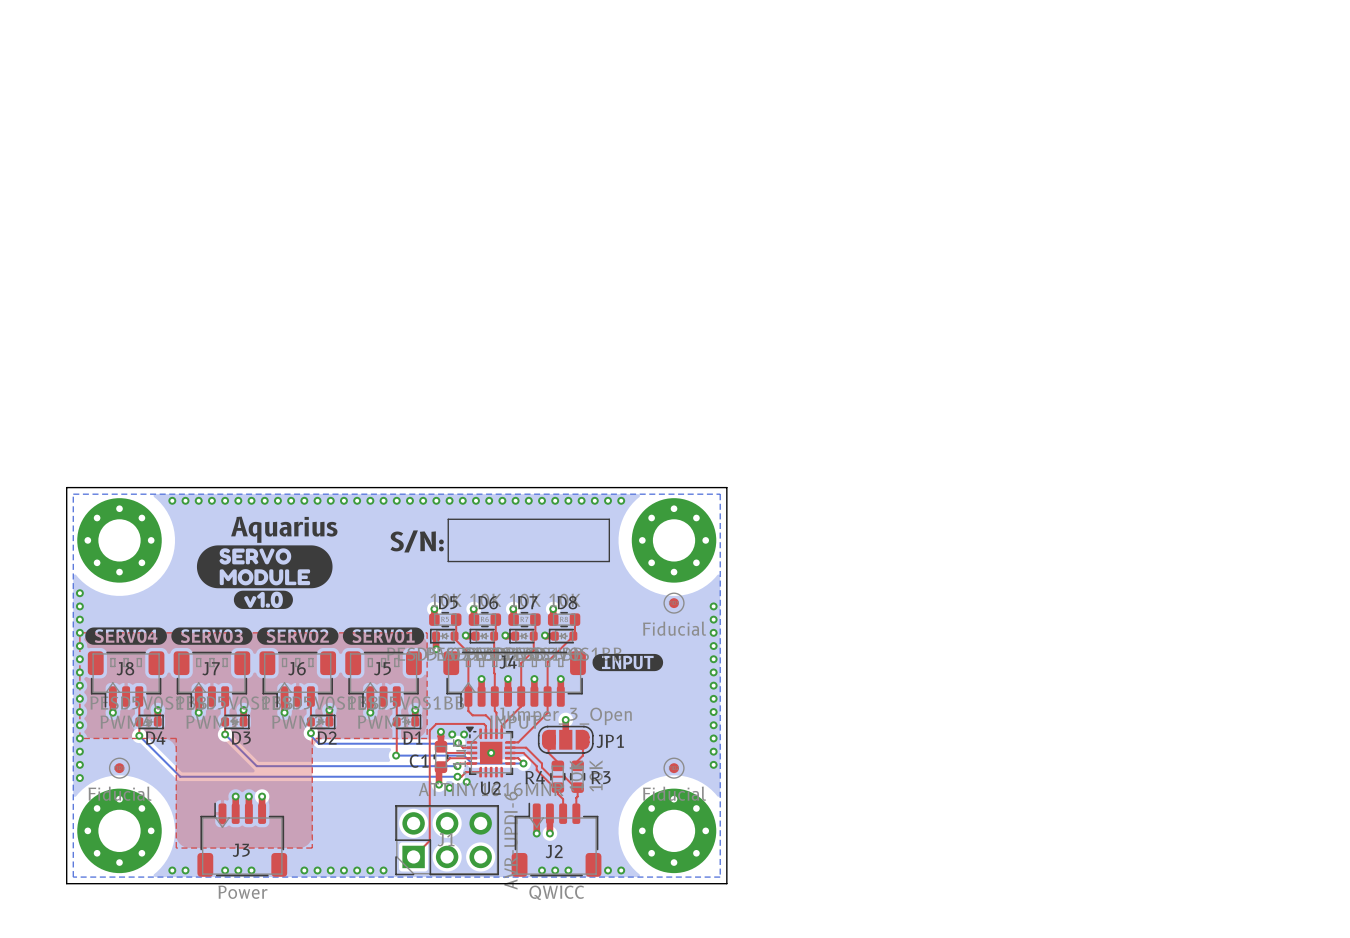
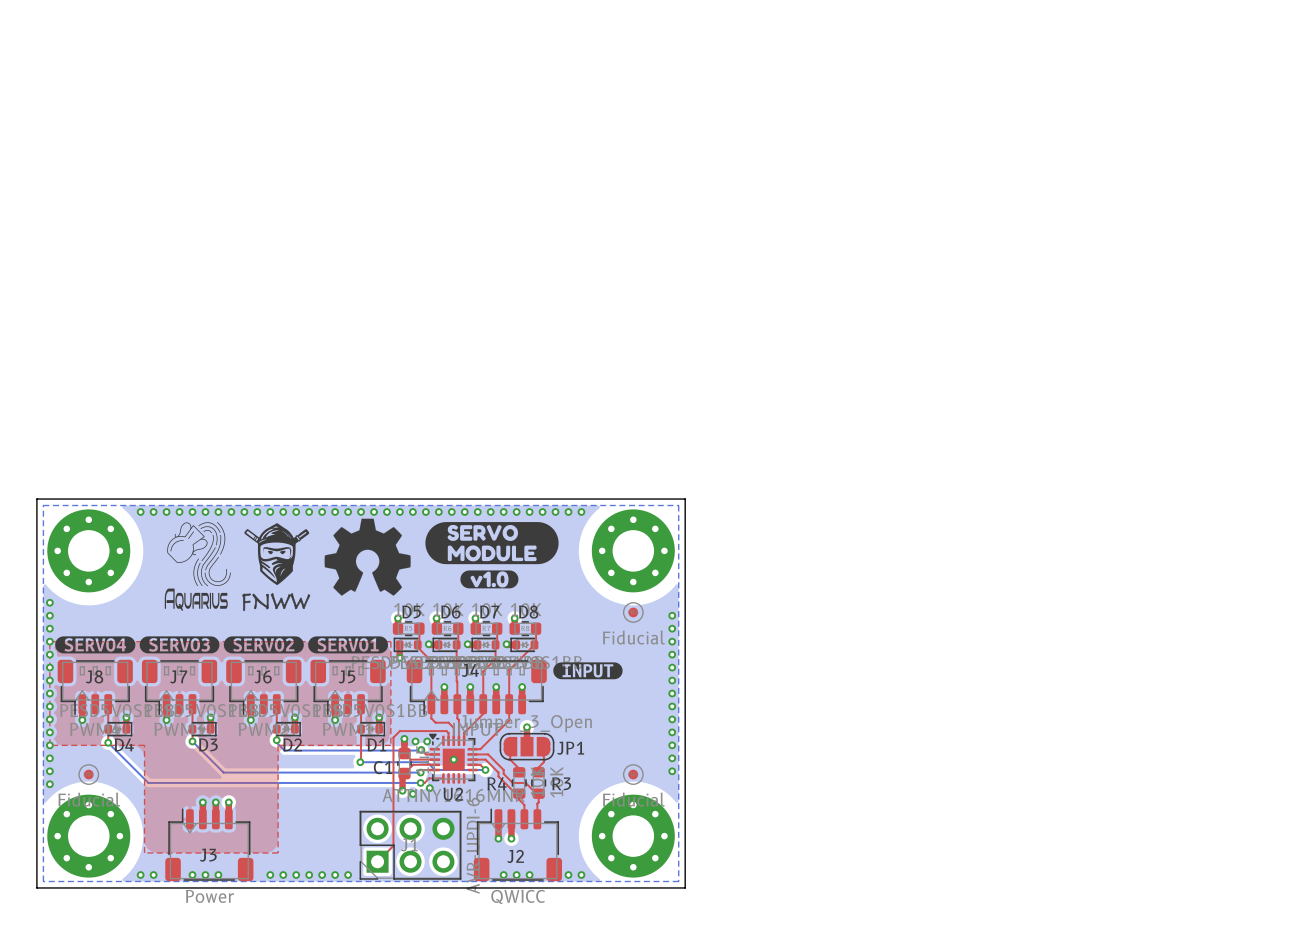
drawing: none -> [164, 518, 411, 612]
line: (448, 519) (609, 519) (609, 561) (448, 561) (448, 519) -> none
text: Aquarius (284, 529) -> none
text: S/N: (417, 541) -> none
drawing position: (264, 566) -> (492, 543)
drawing position: (263, 599) -> (489, 579)

